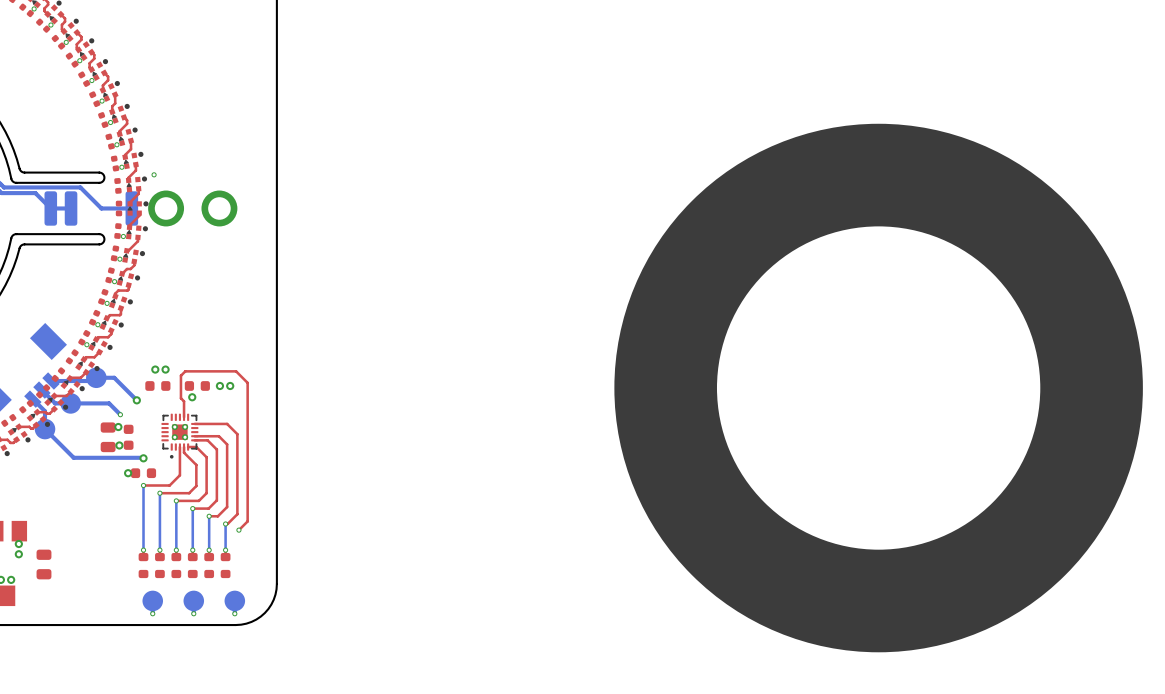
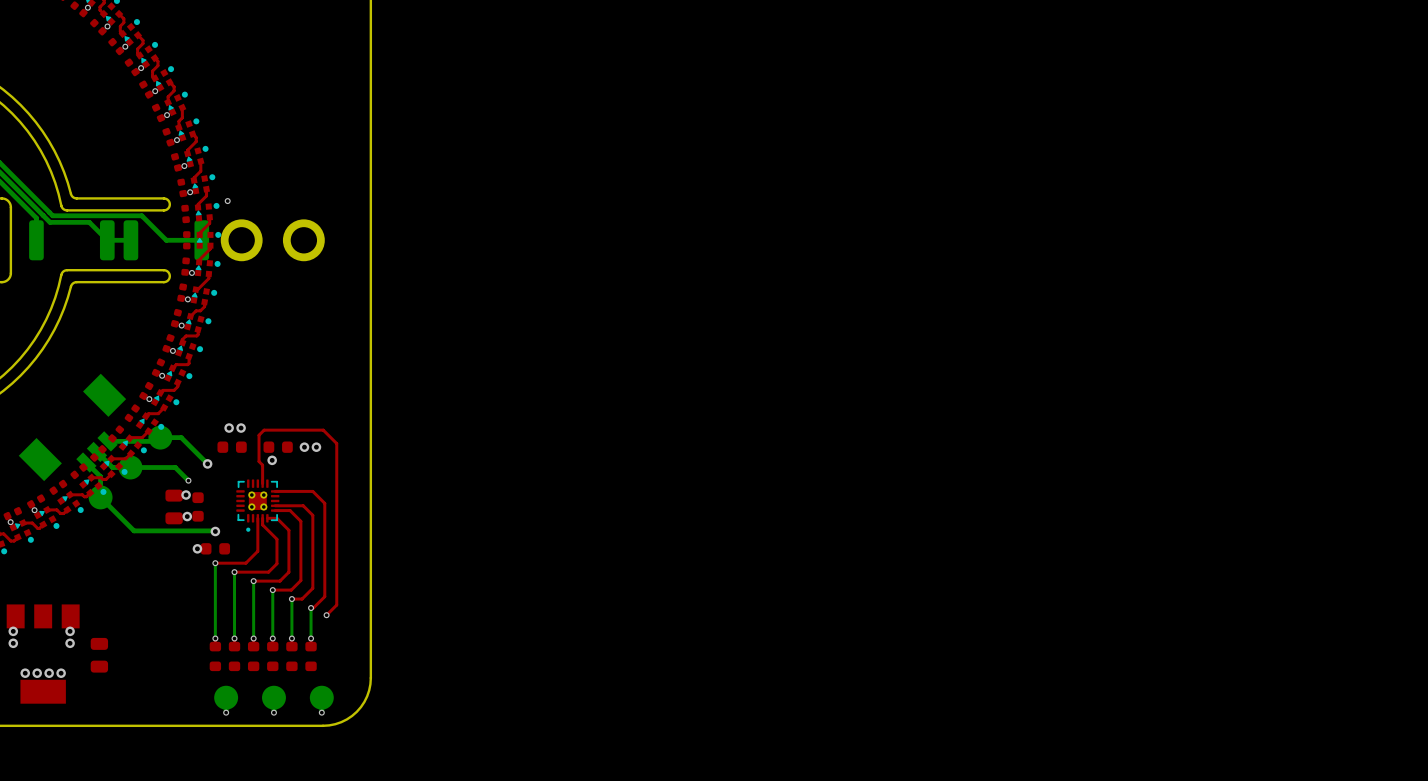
drawing: [614, 123, 1143, 653] -> none

